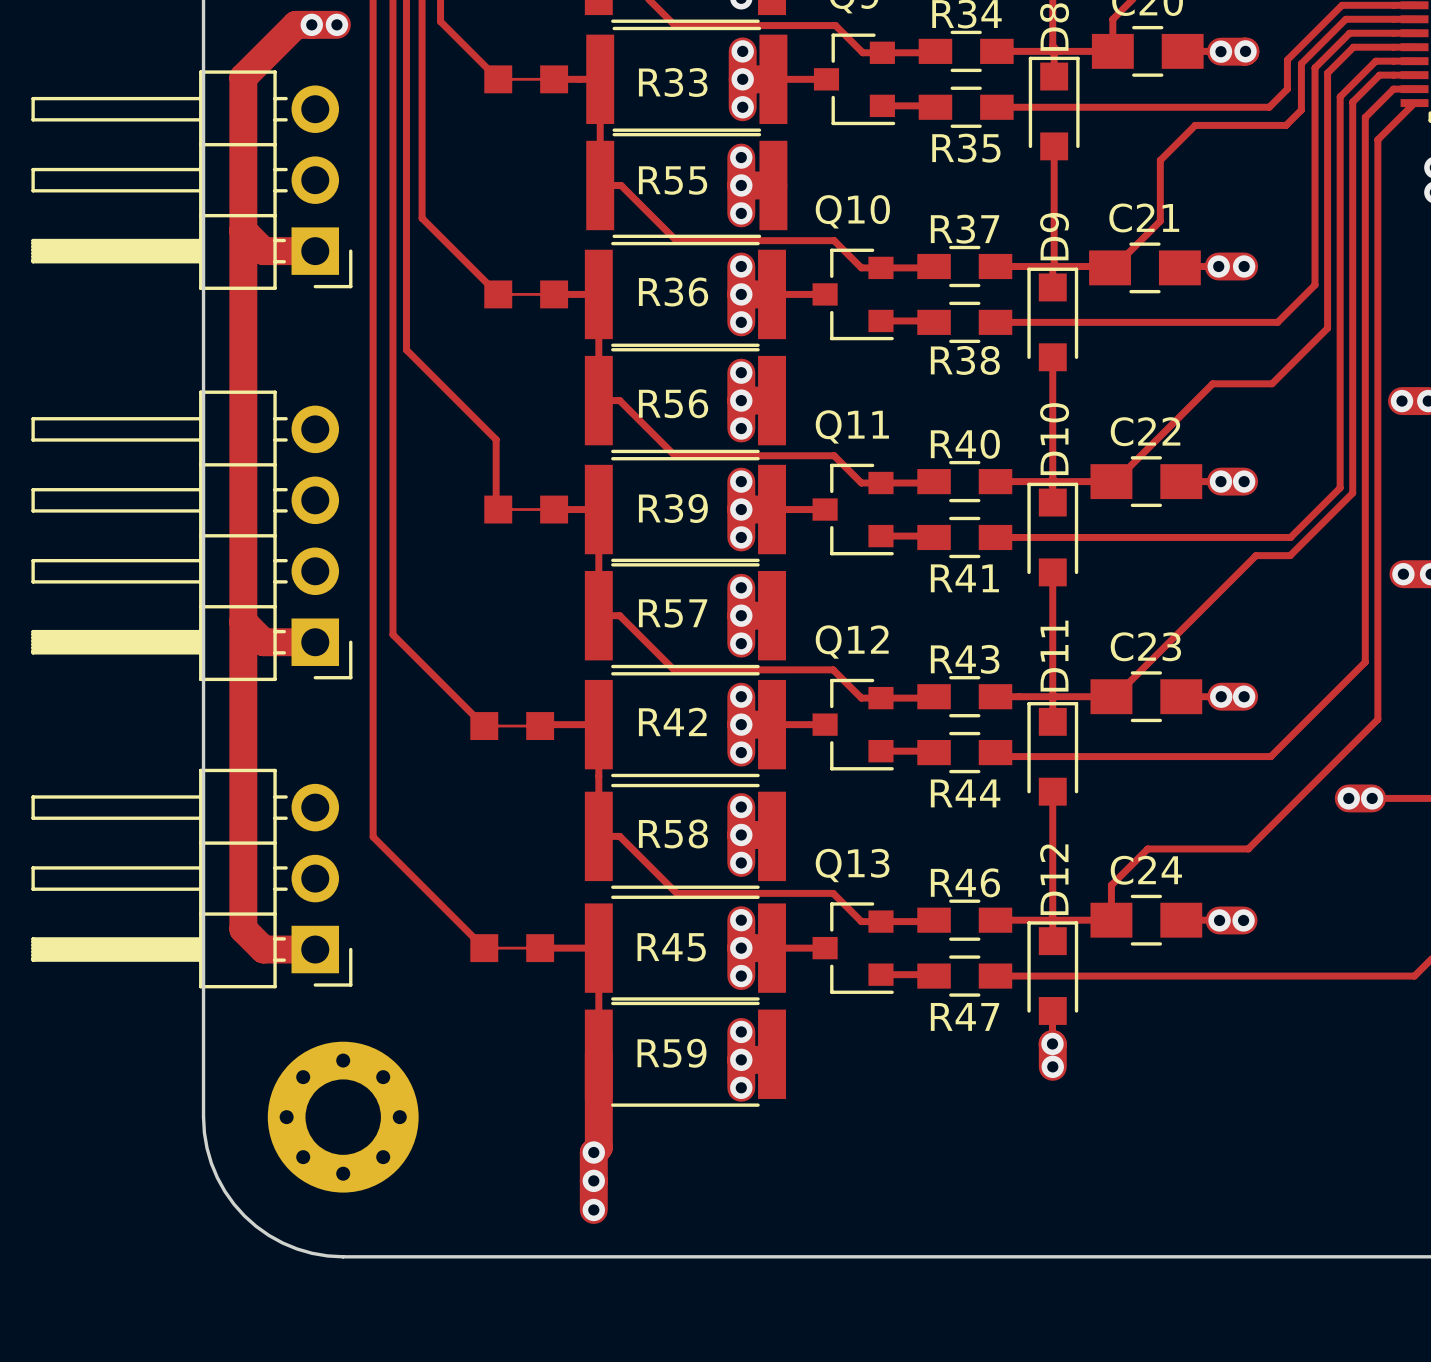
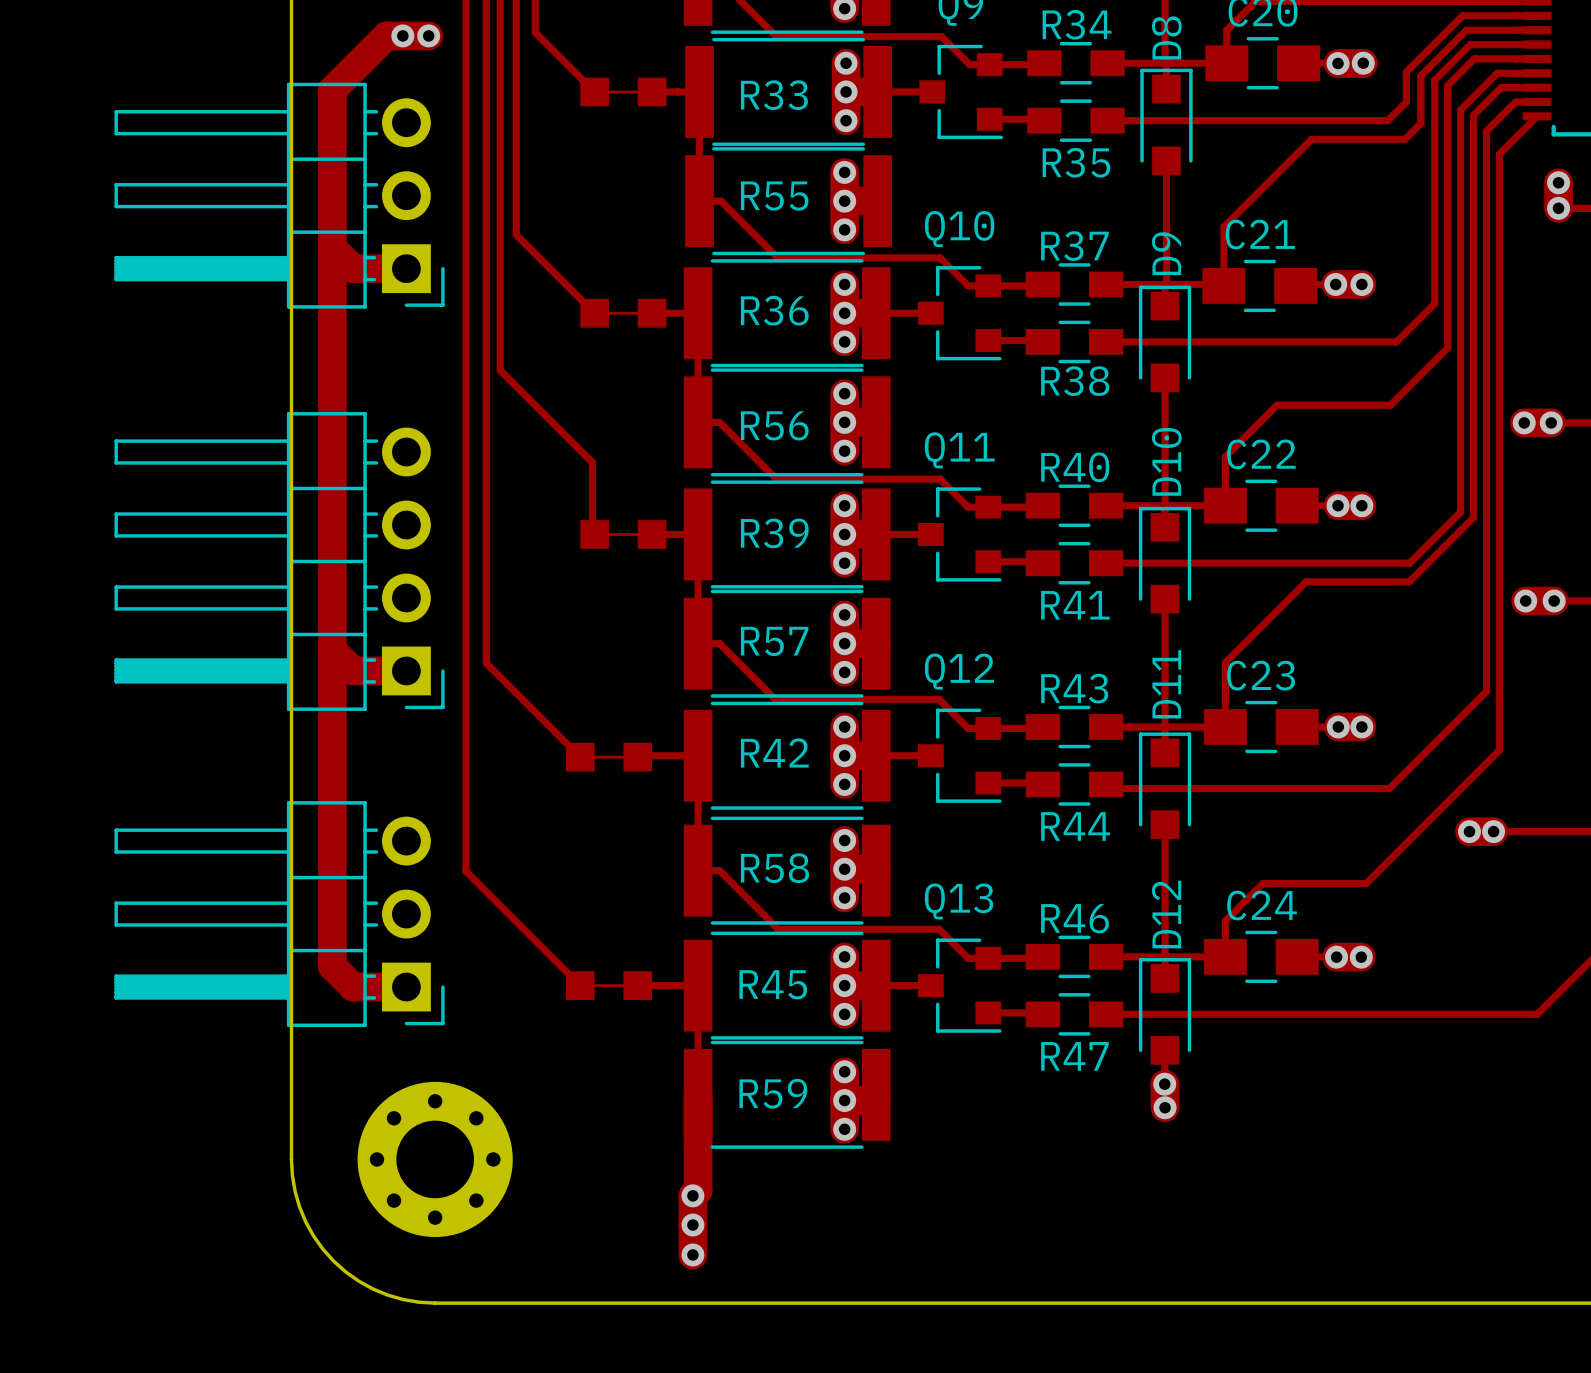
track: (1160, 160) (1160, 221) (1113, 267) (1110, 267) -> (1275, 175) (1223, 227) (1223, 285)
track: (1212, 383) (1114, 481) (1111, 481) -> (1329, 405) (1277, 405) (1225, 456) (1225, 505)
track: (1256, 555) (1114, 696) (1111, 696) -> (1374, 581) (1306, 581) (1225, 662) (1225, 727)

